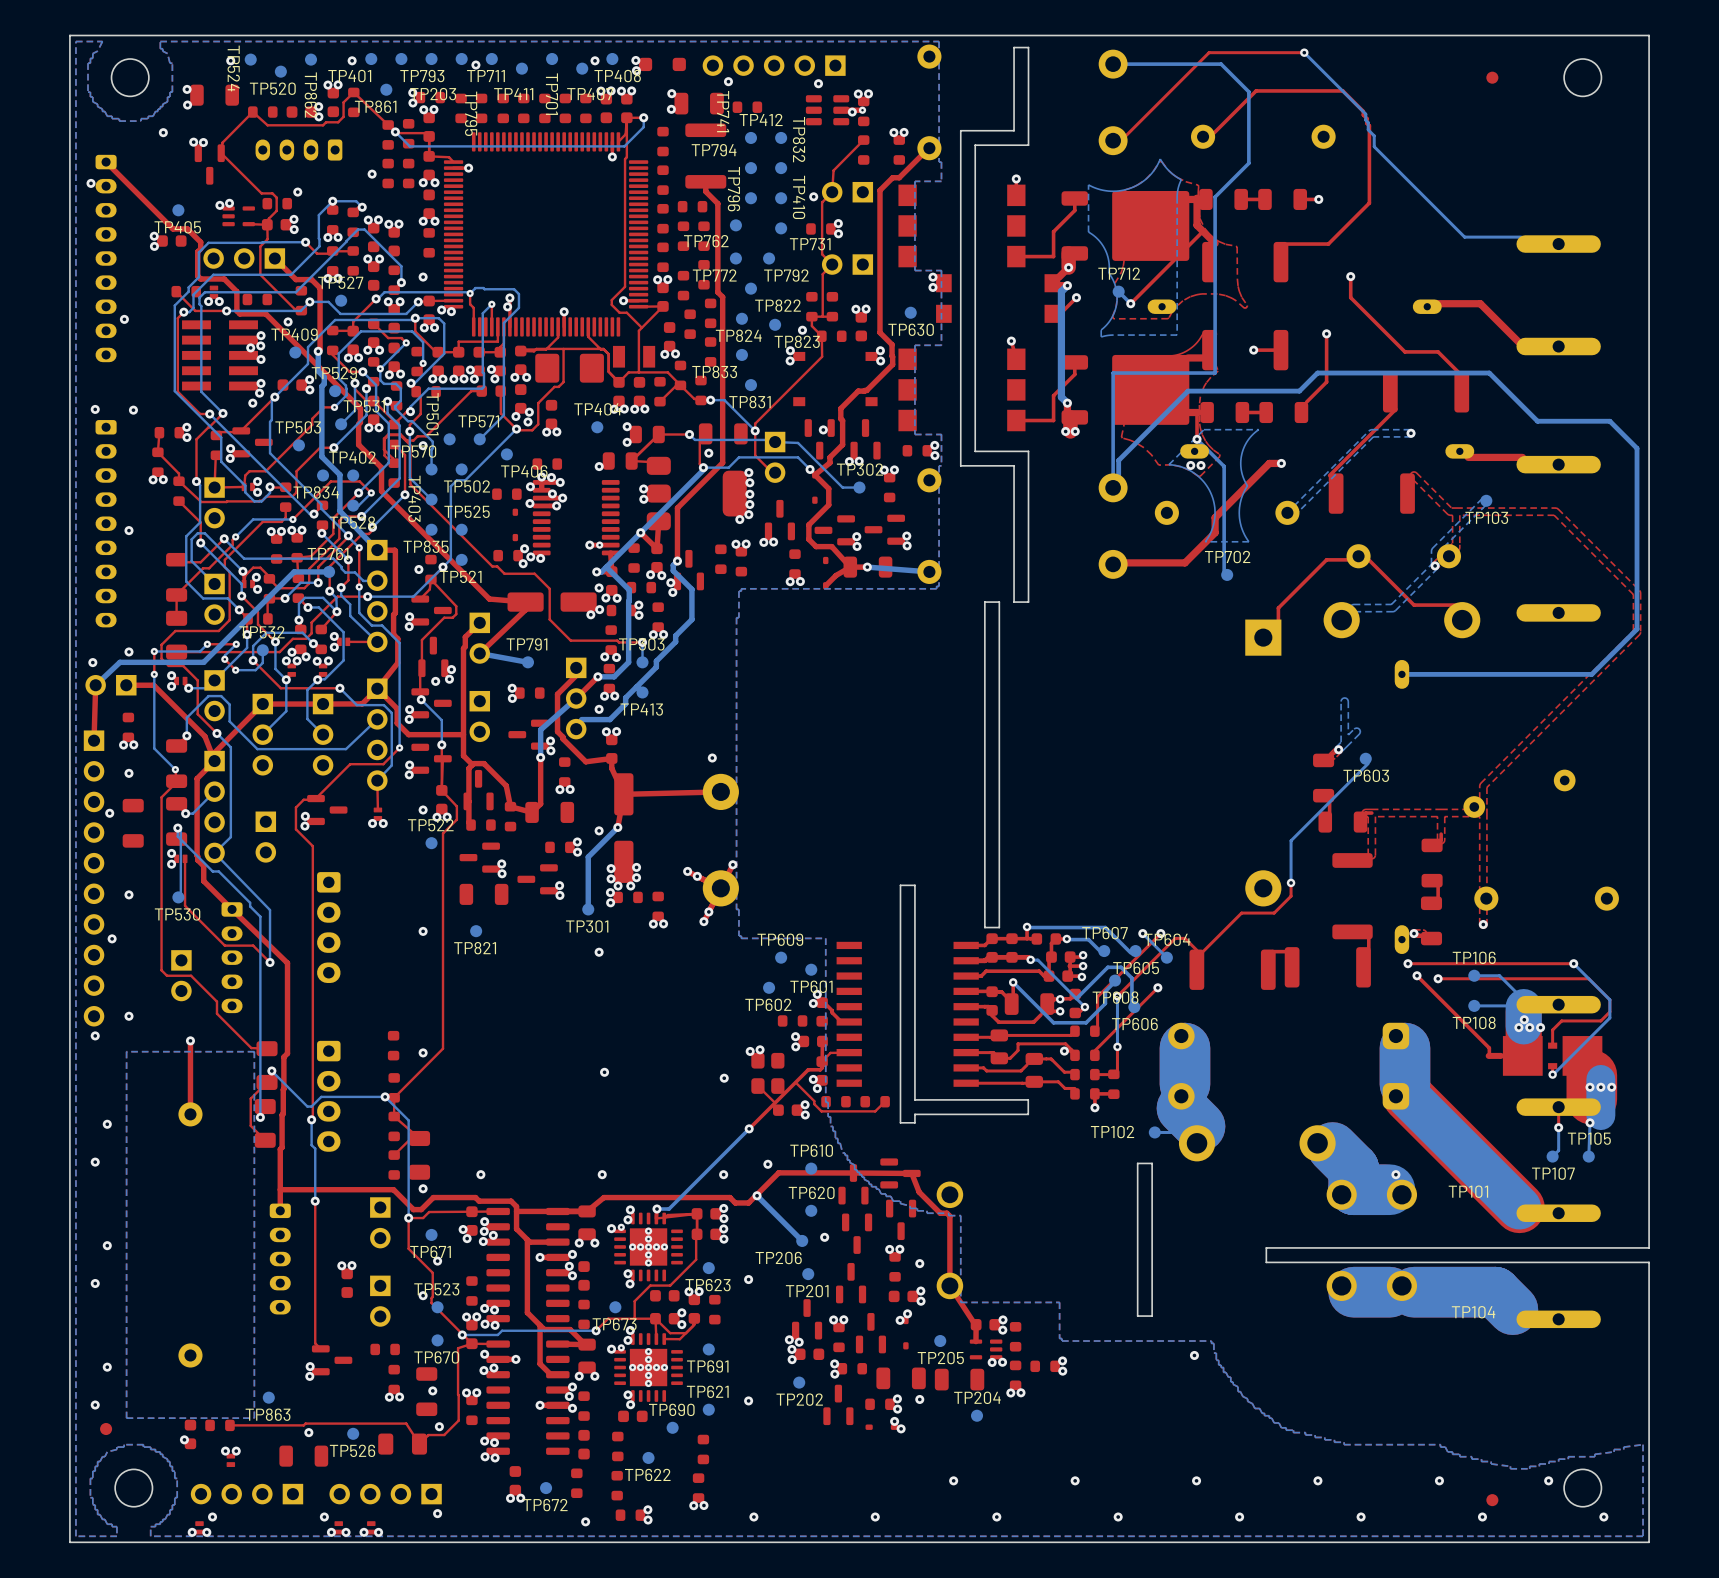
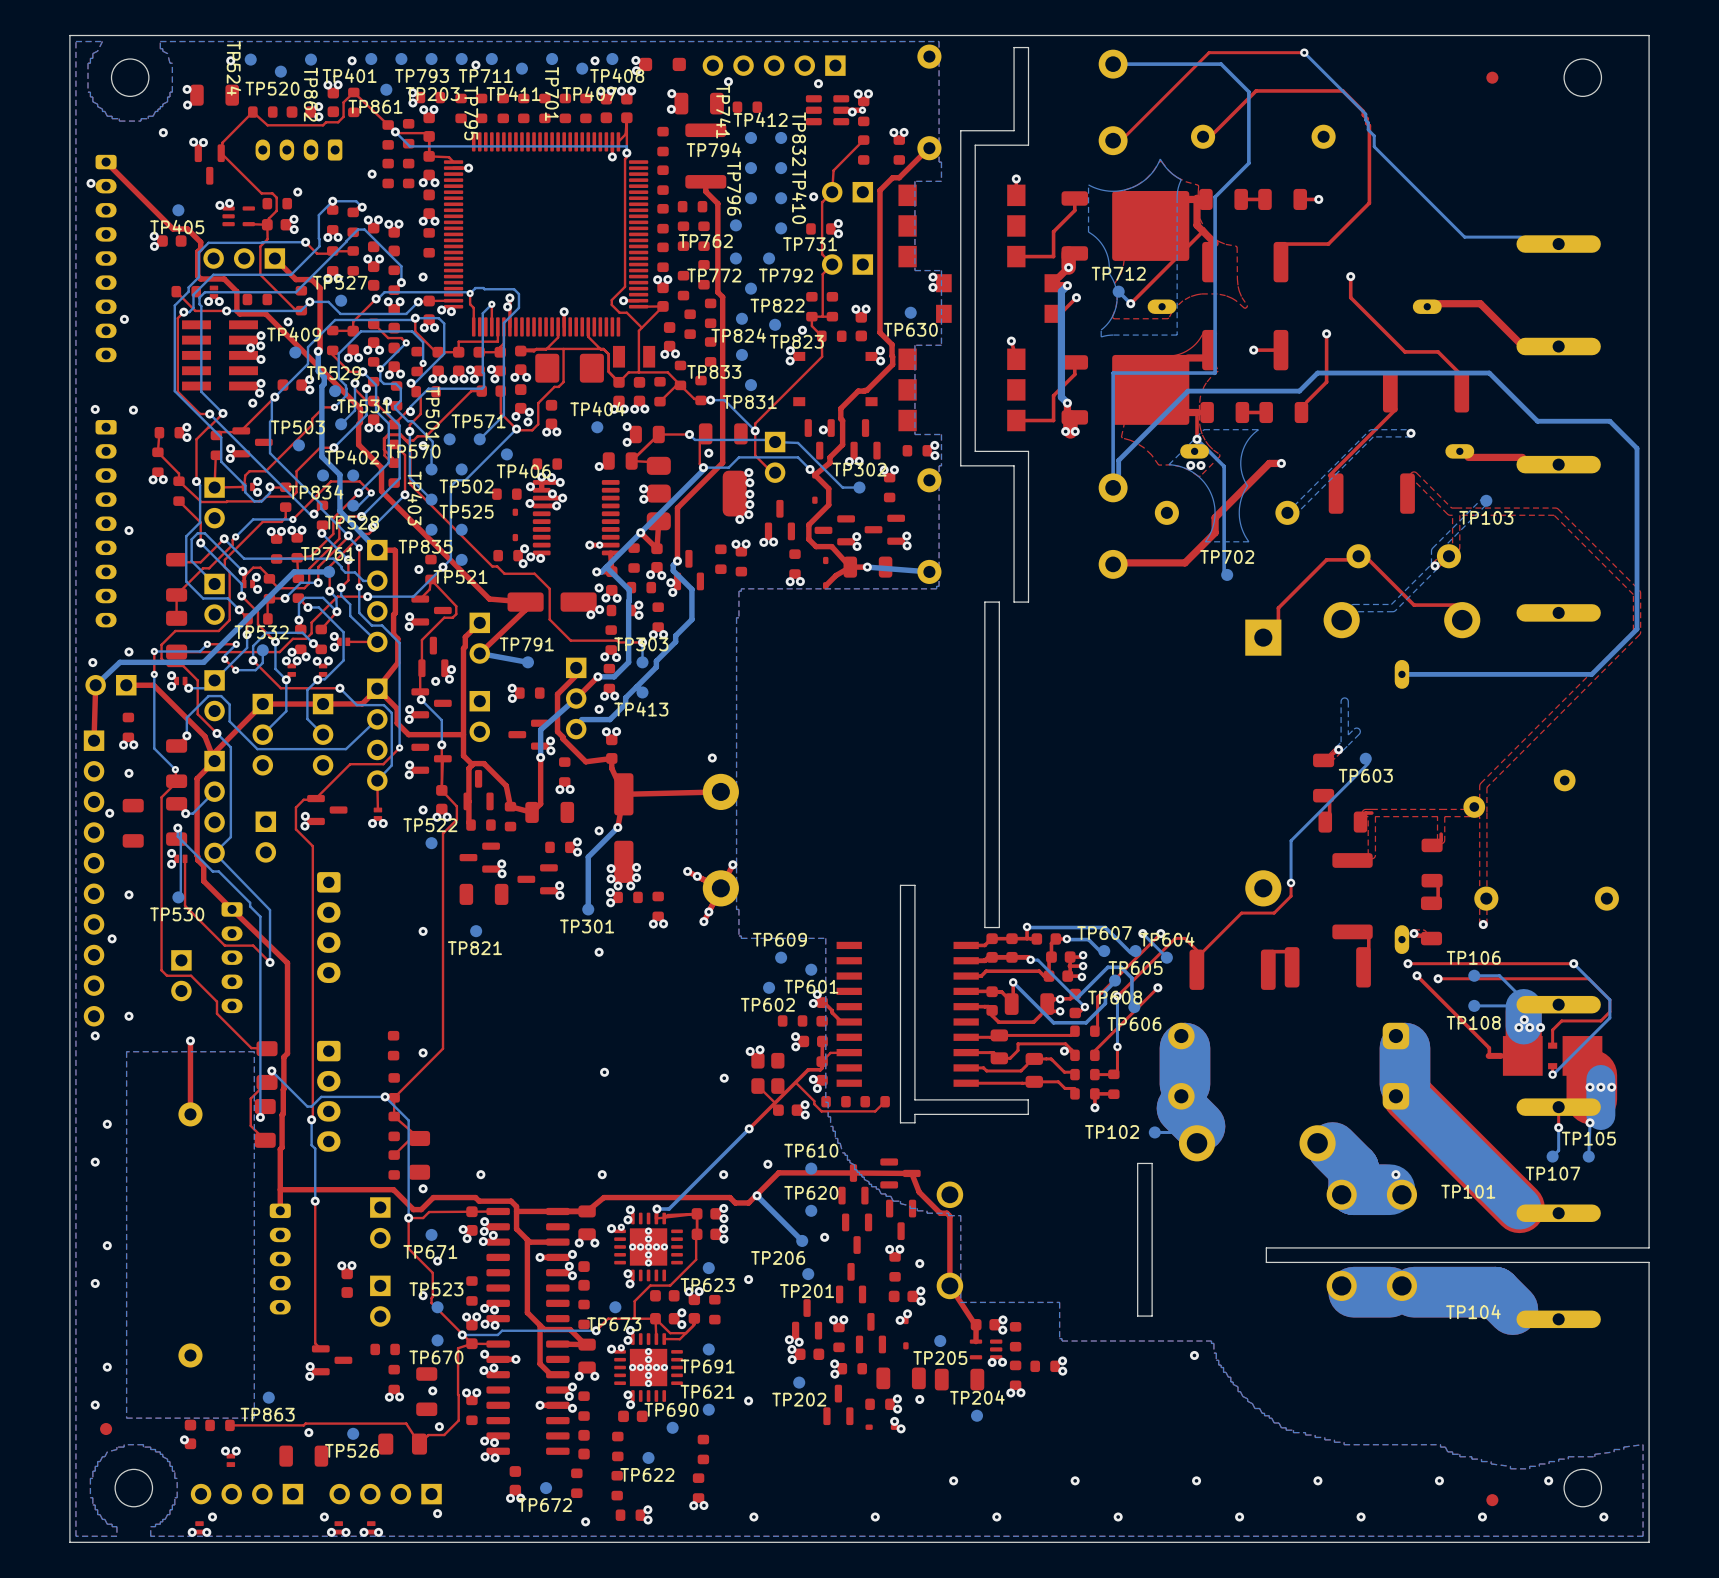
top track: (643, 117) (626, 117) -> none
bottom track: (643, 117) (643, 127) (624, 146) -> (626, 153) (626, 146) (624, 146)
via position: (643, 117) -> (626, 153)

